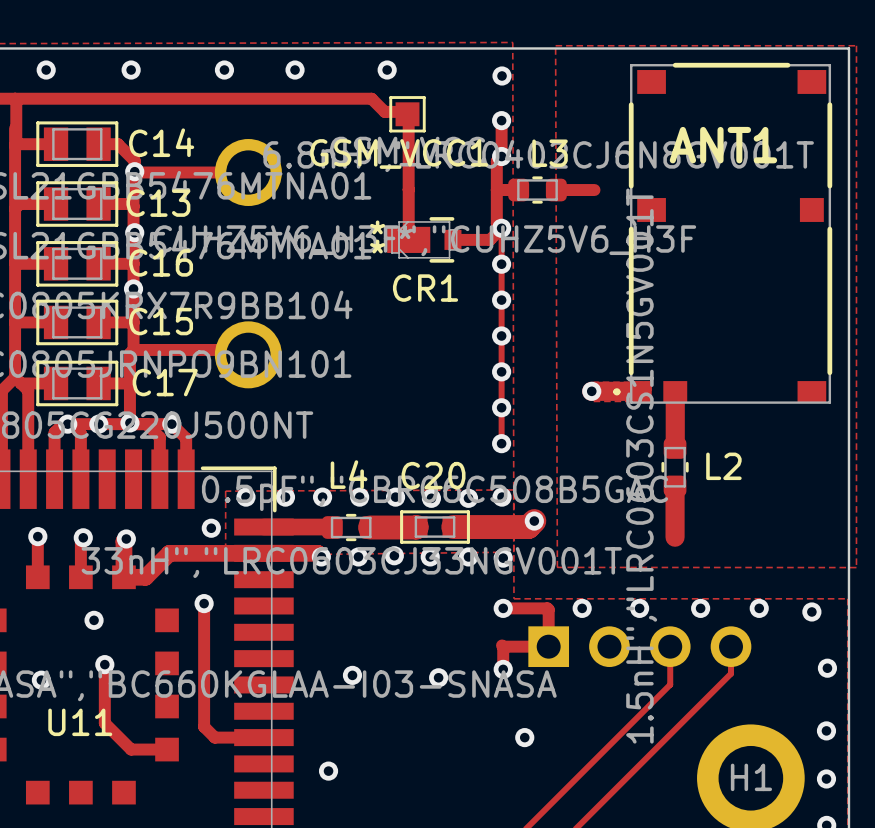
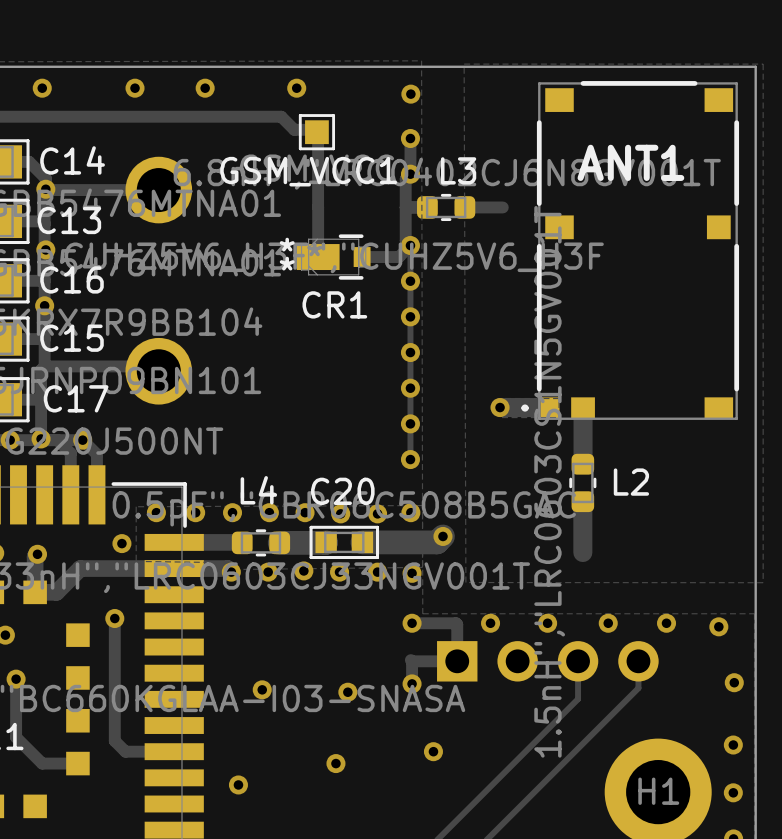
via: none -> (335, 763)

